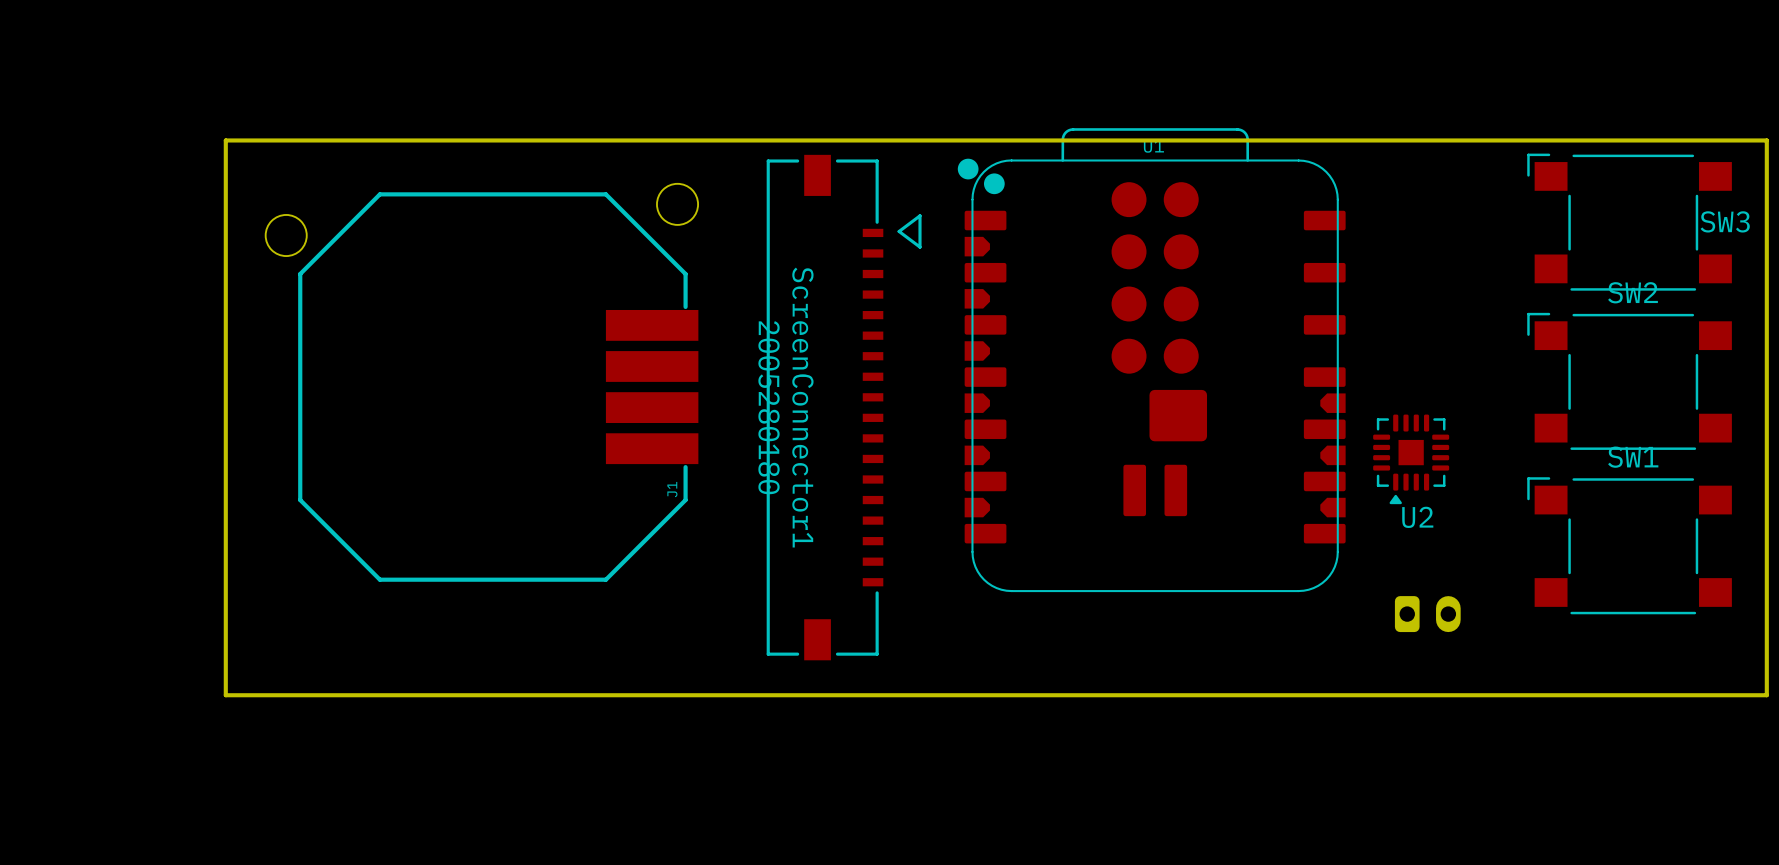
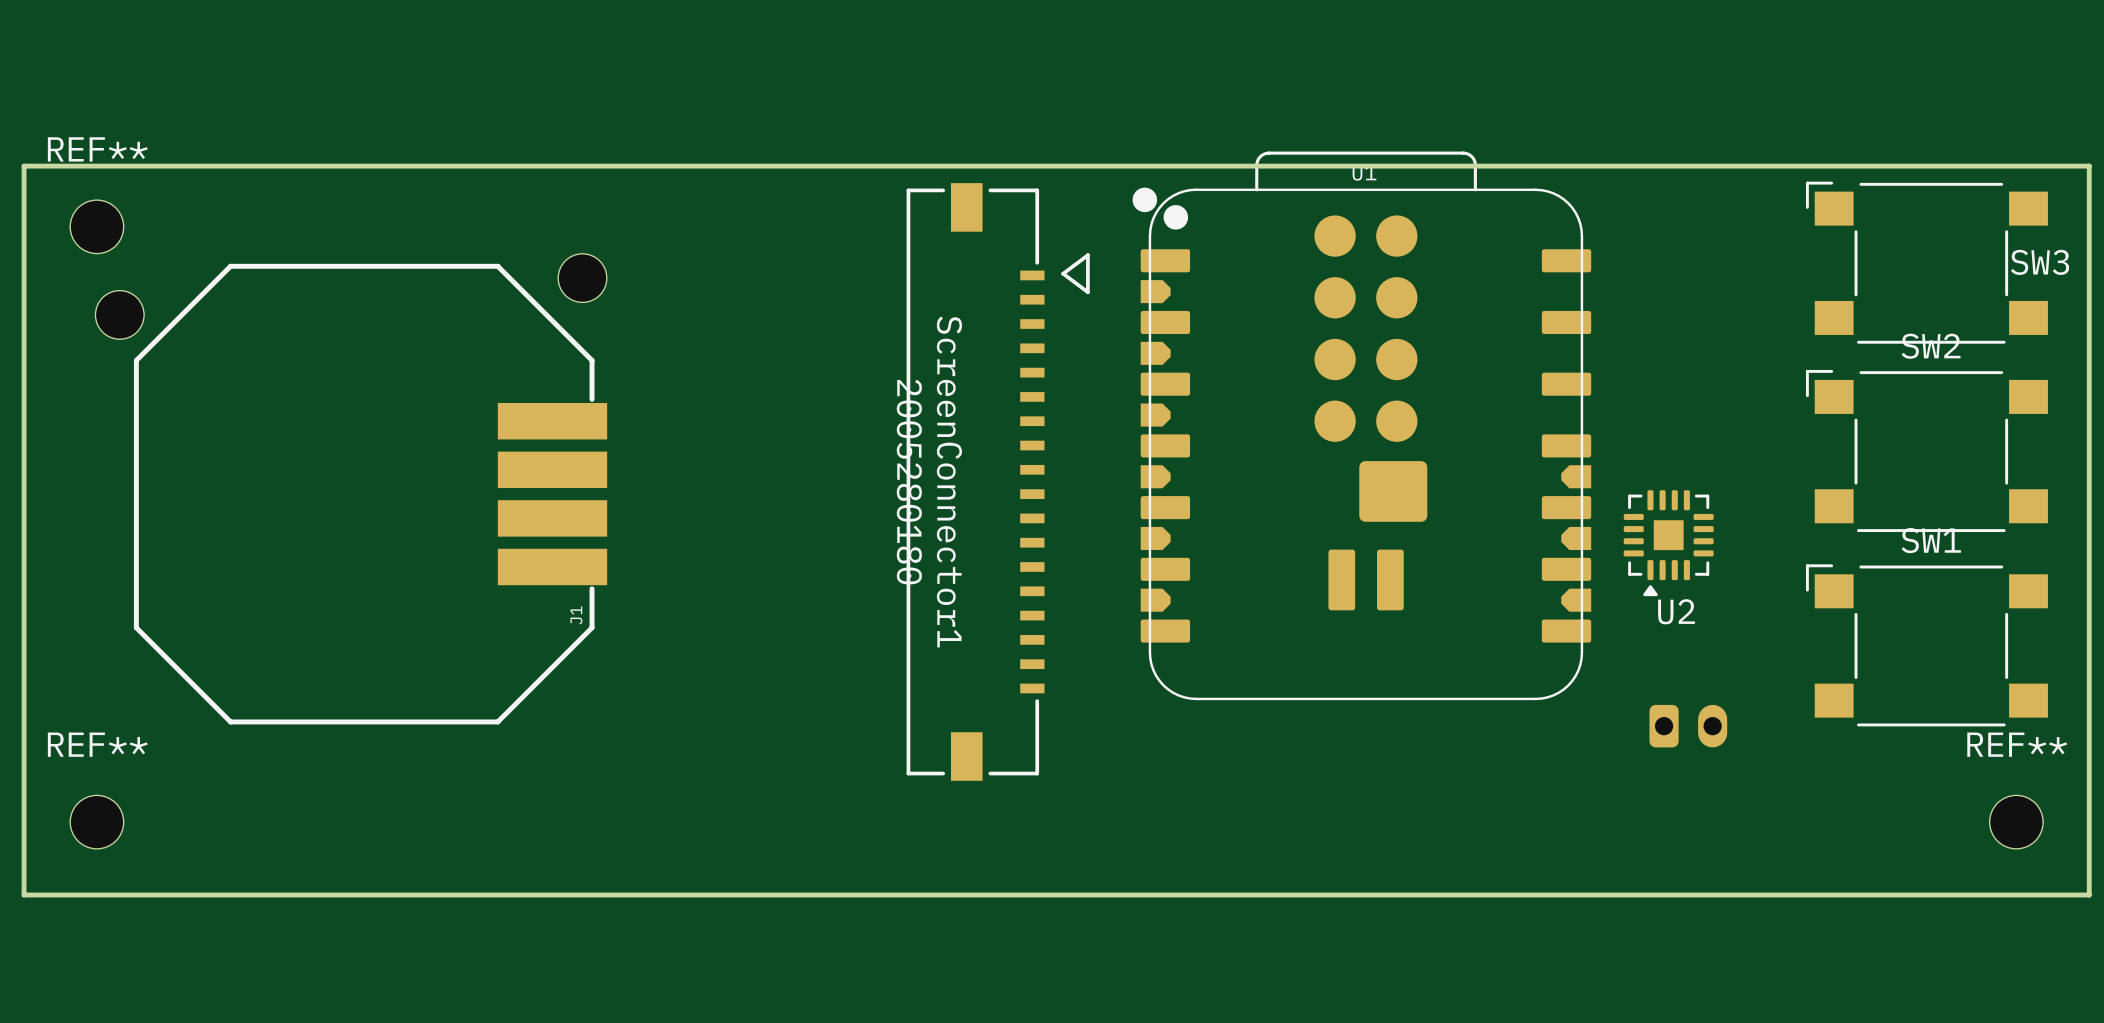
board edge: (225, 140) (225, 695) (1766, 695) -> (267, 166) (24, 166) (24, 895) (2089, 895) (2089, 822)
REF**: none -> (96, 226)
J1 position: (482, 382) -> (351, 489)
REF**: none -> (96, 822)
REF**: none -> (2016, 822)

